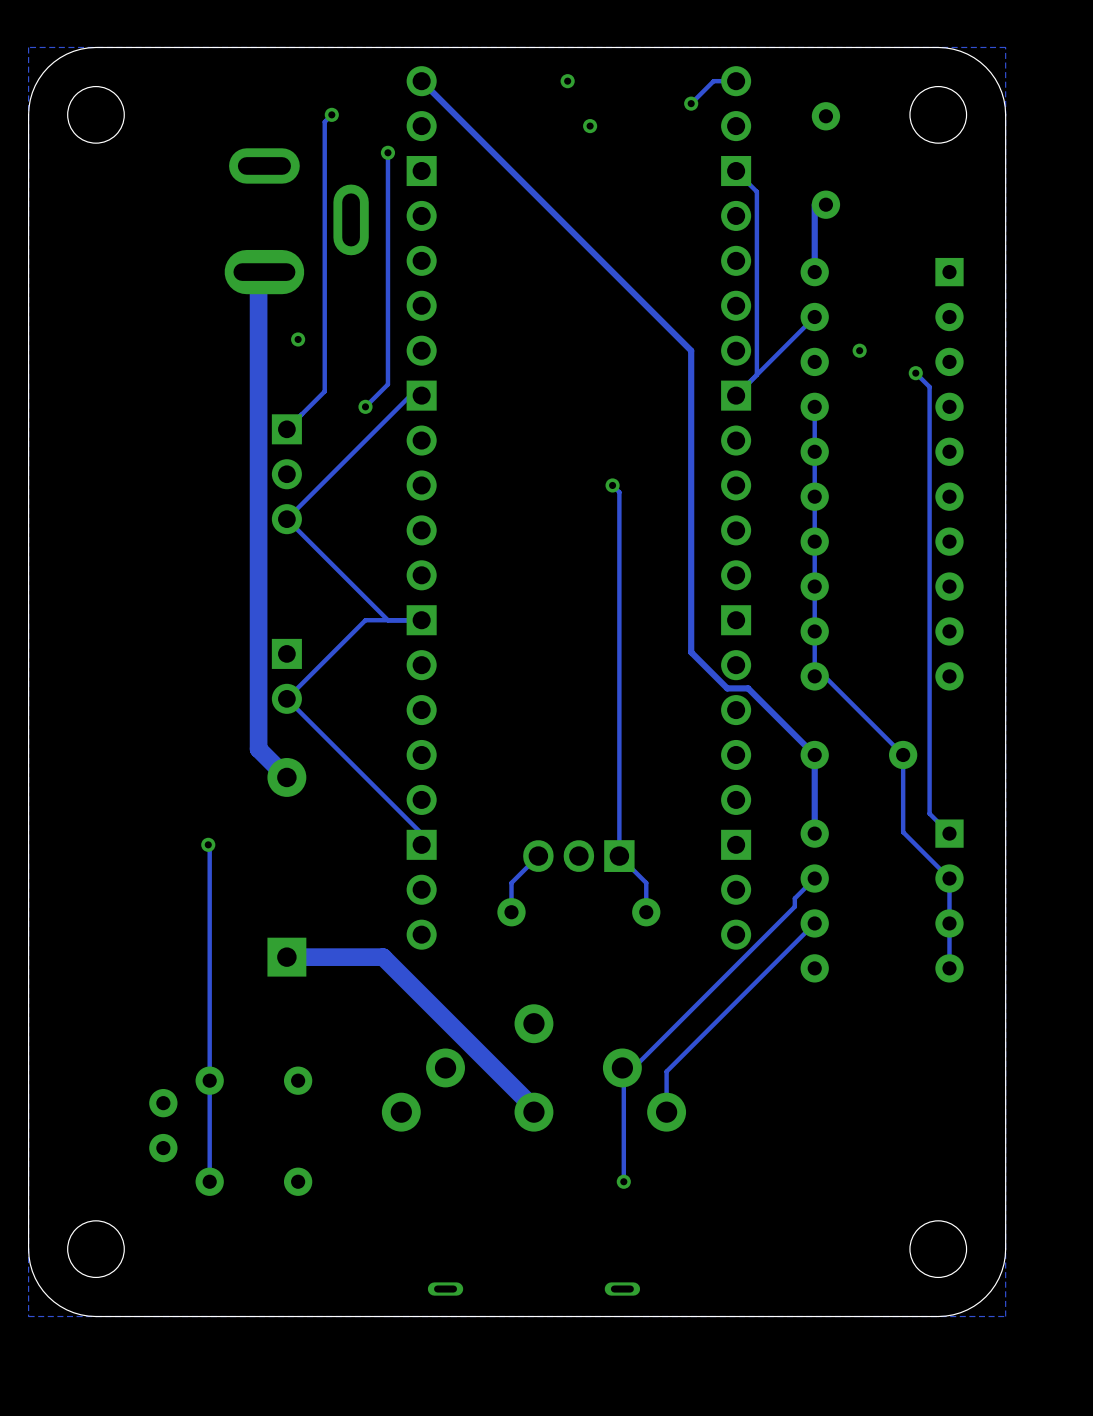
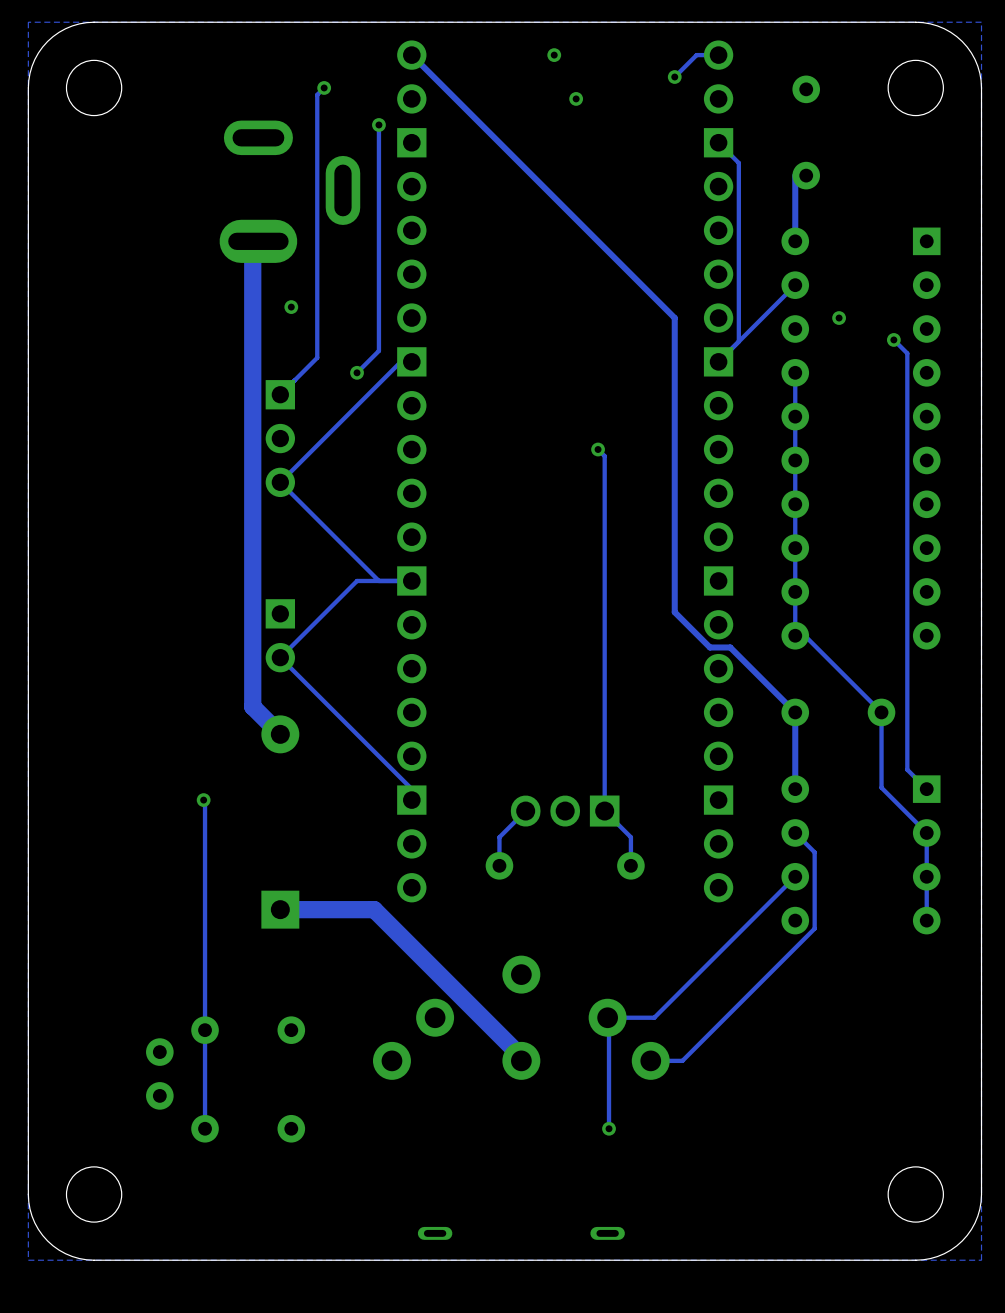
track: (814, 878) (794, 898) (794, 906) (633, 1067) -> (795, 832) (814, 852) (814, 928) (682, 1060) (650, 1060)
track: (670, 1067) (666, 1071) (666, 1112) -> (654, 1017) (618, 1017)

